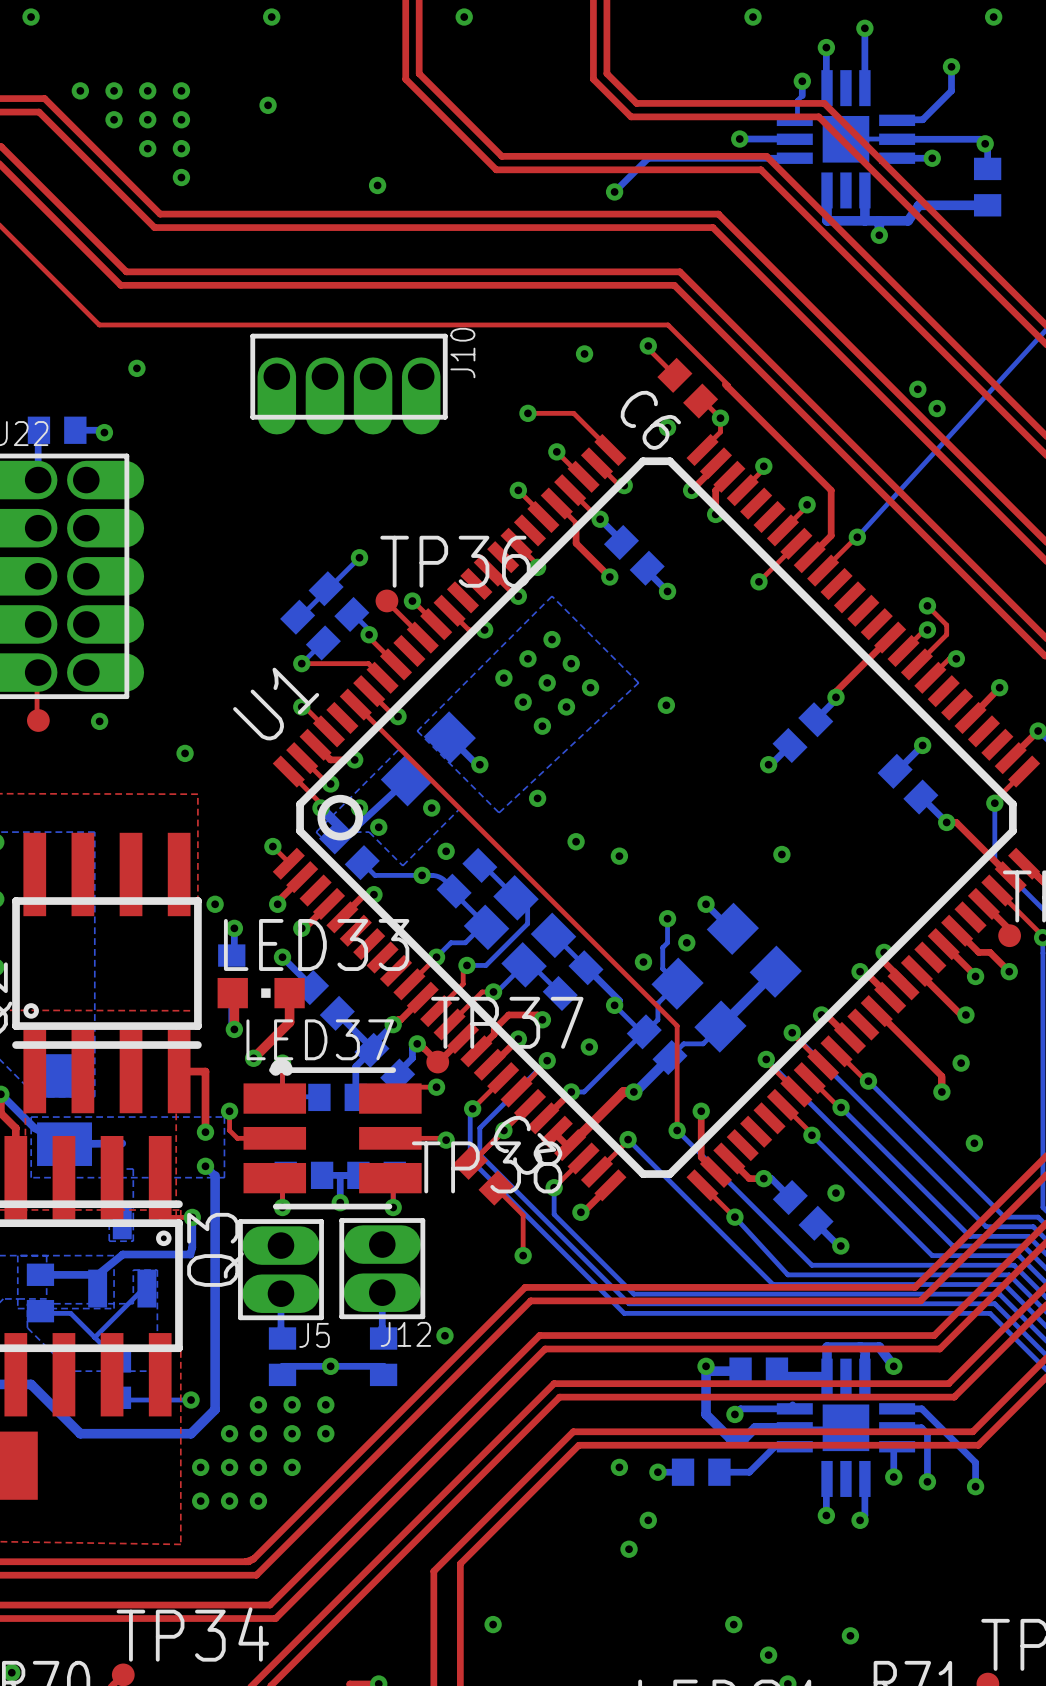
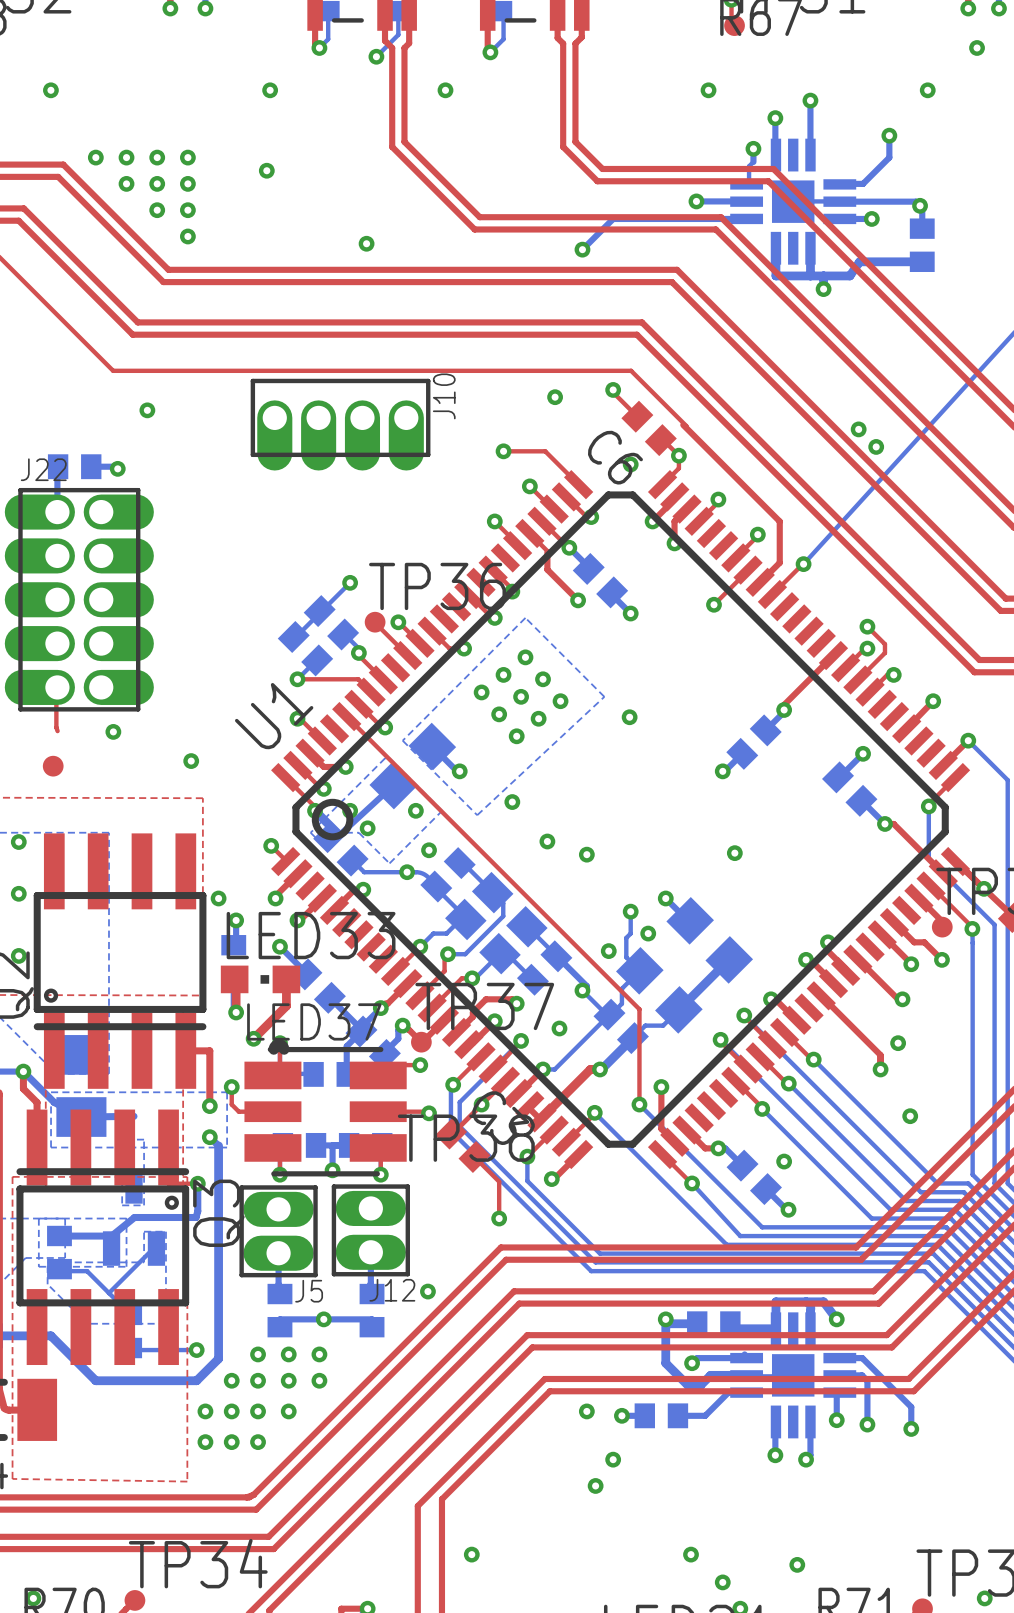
TP38 position: (38, 720) -> (53, 766)

